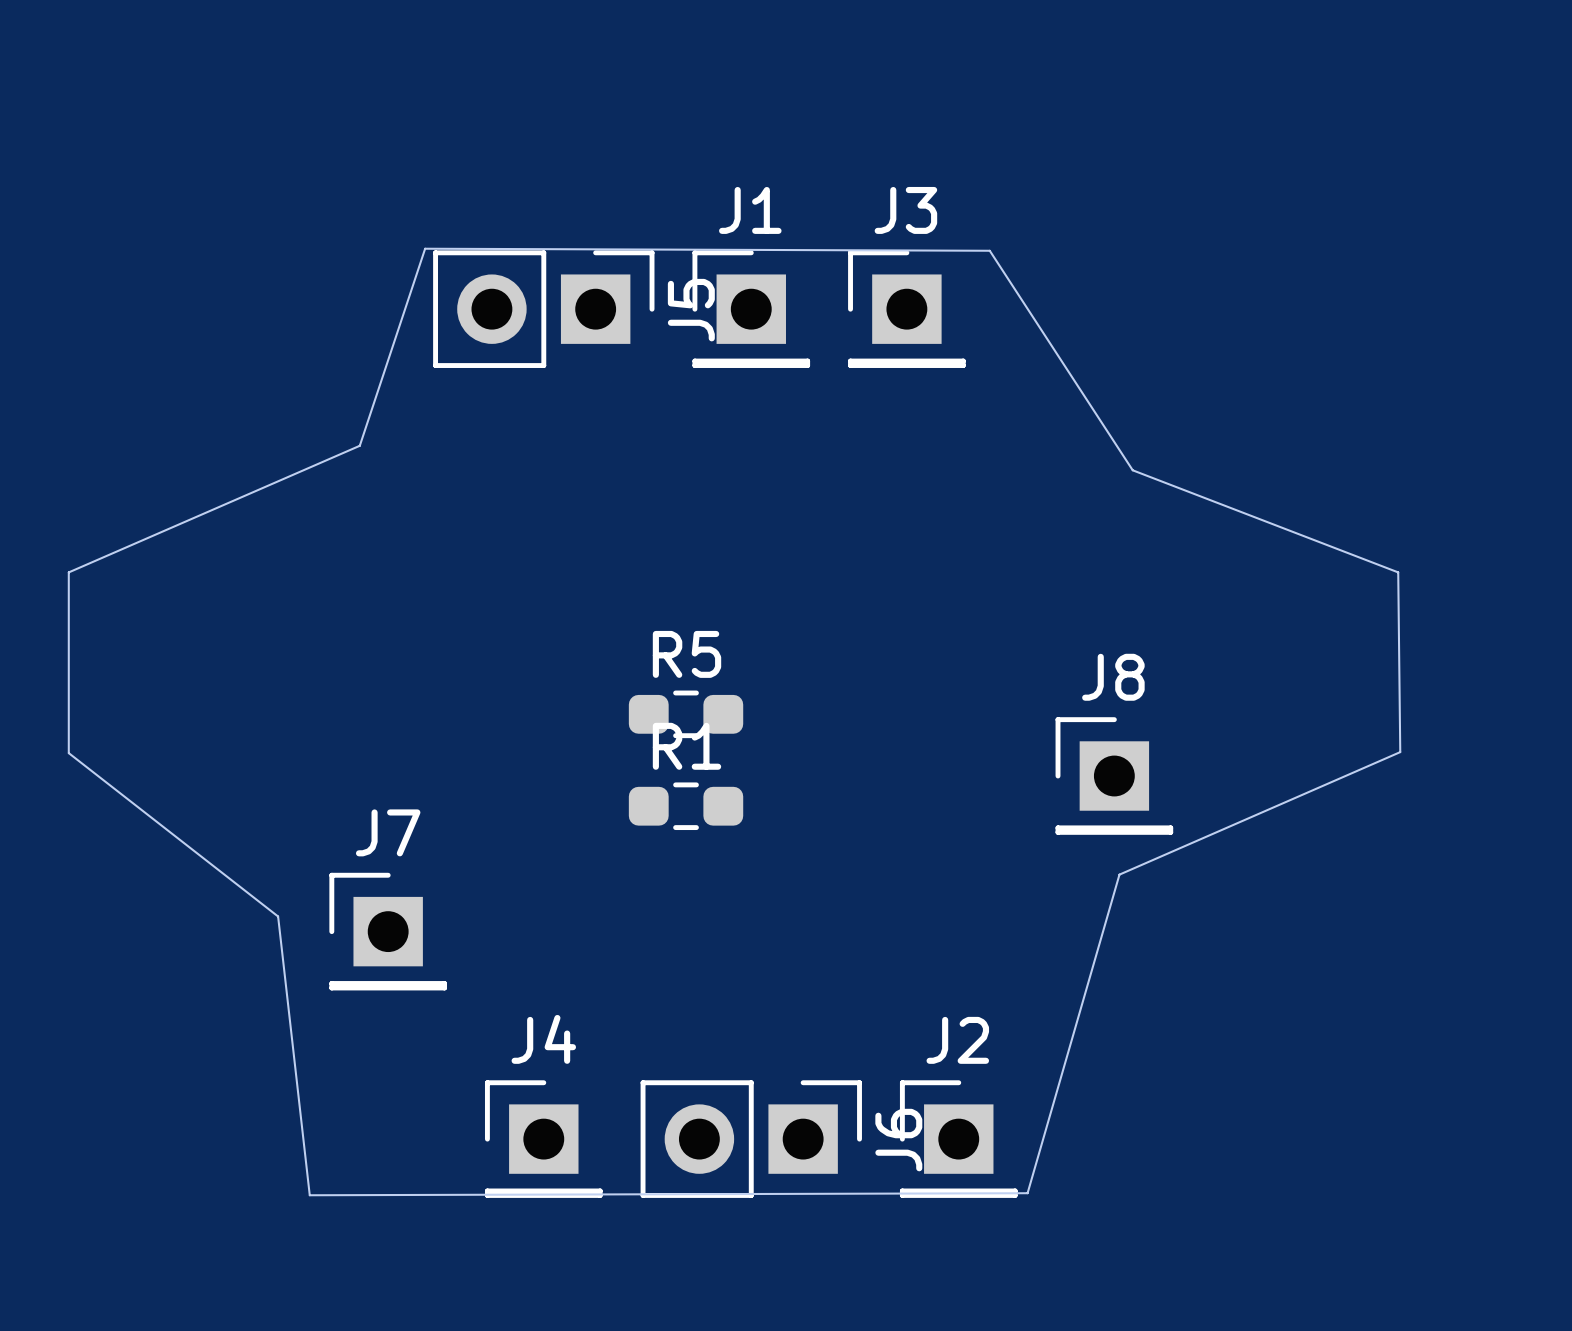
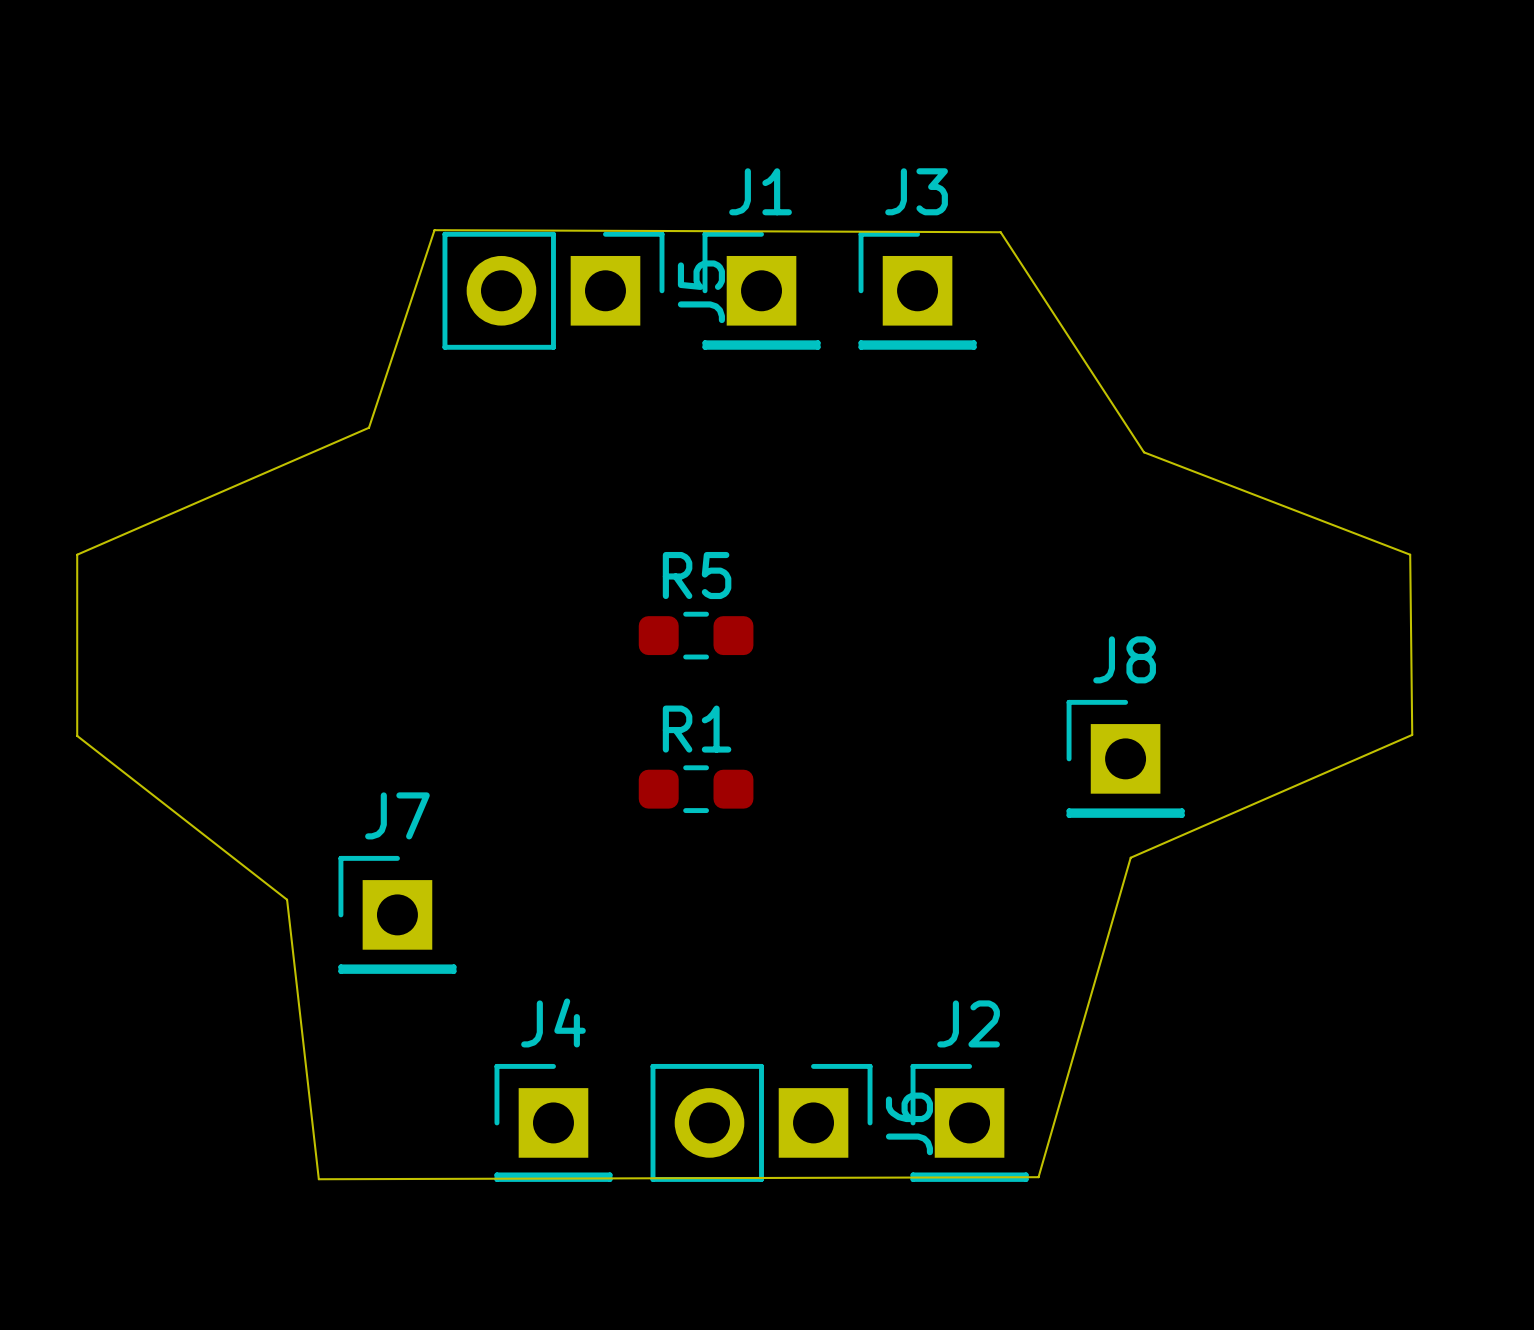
R5 position: (686, 714) -> (696, 635)

